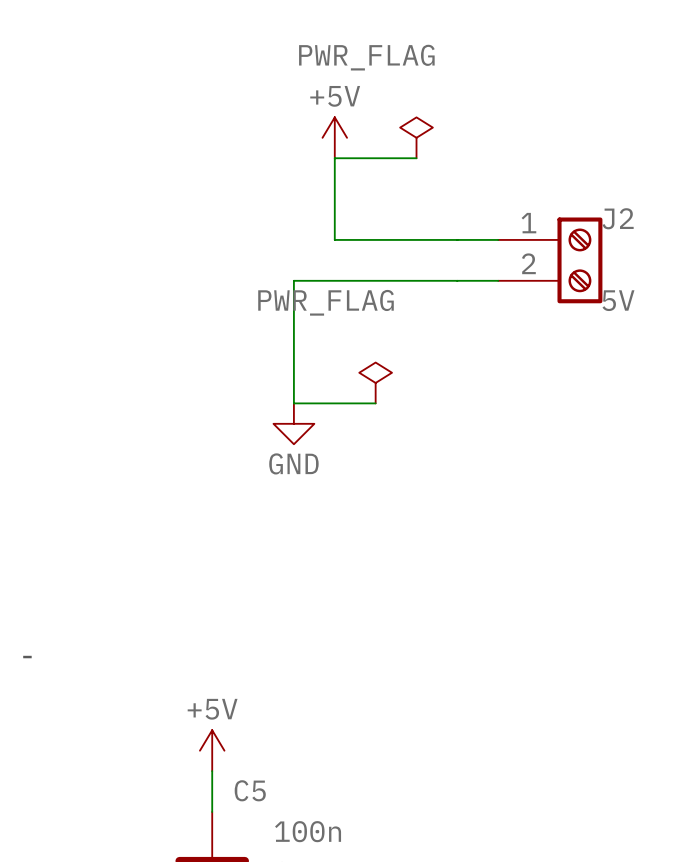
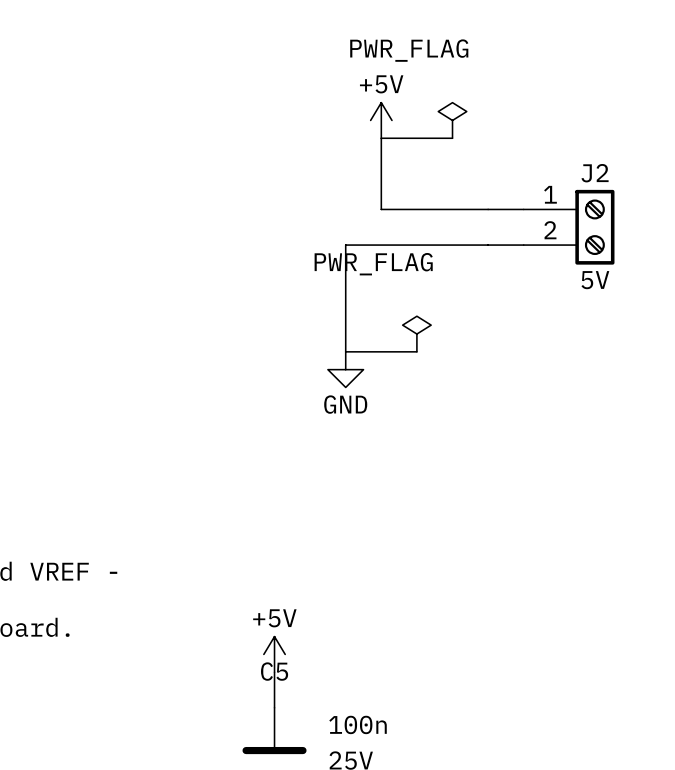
J2 name position: J2 (618, 218) -> J2 (595, 173)
J2 value position: 5V (618, 300) -> 5V (595, 280)
C5 name position: C5 (250, 790) -> C5 (274, 671)

